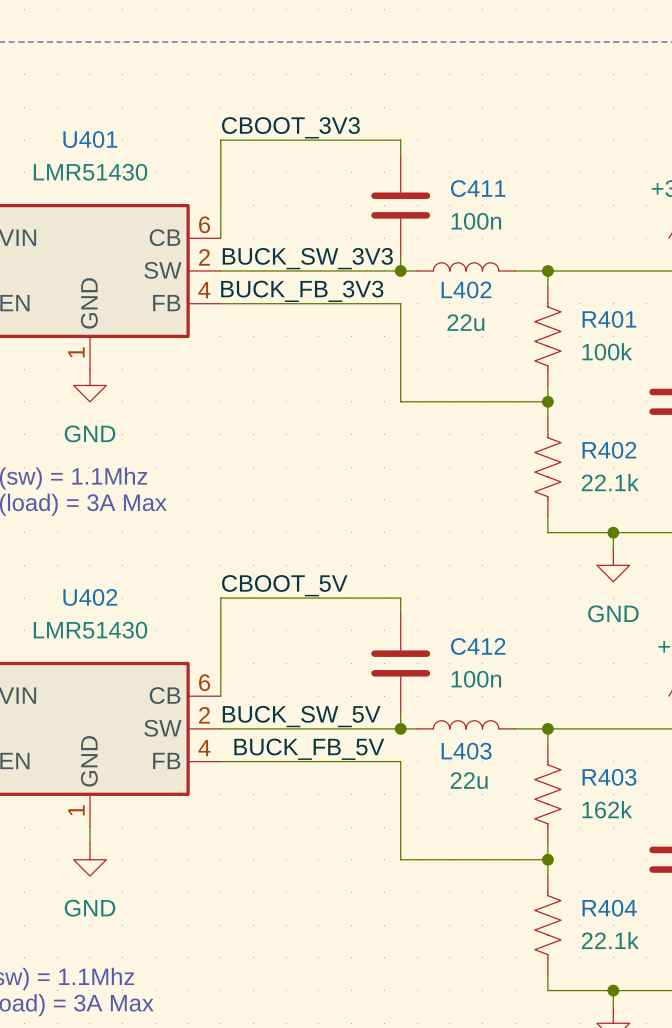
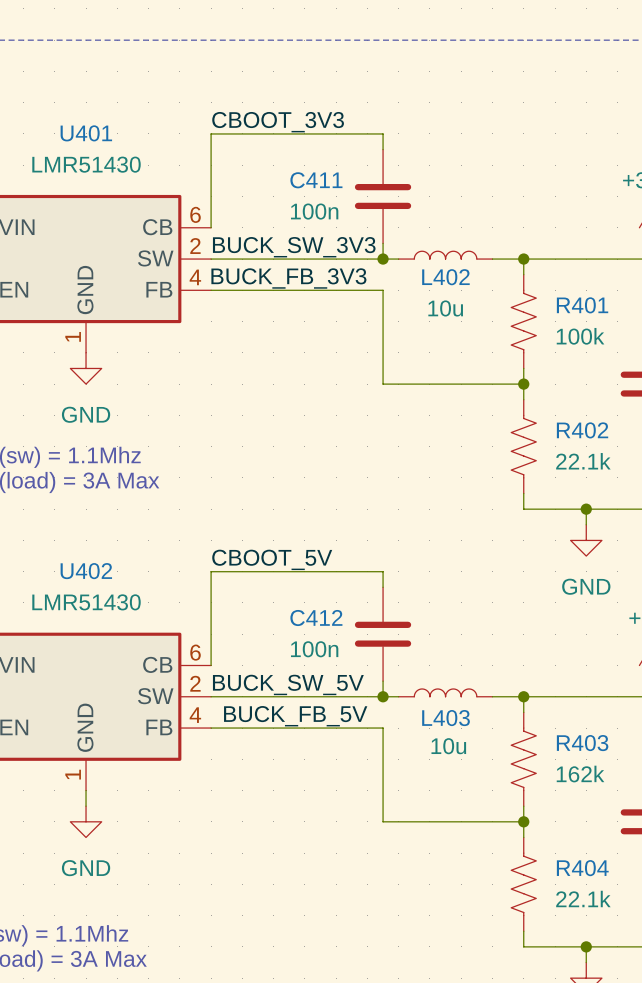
C411 name position: C411 (478, 188) -> C411 (316, 180)
C411 value position: 100n (476, 221) -> 100n (314, 211)
L402 value: 22u (465, 322) -> 10u (445, 308)
C412 name position: C412 (478, 646) -> C412 (316, 618)
C412 value position: 100n (476, 679) -> 100n (314, 649)
L403 value: 22u (469, 780) -> 10u (448, 746)

